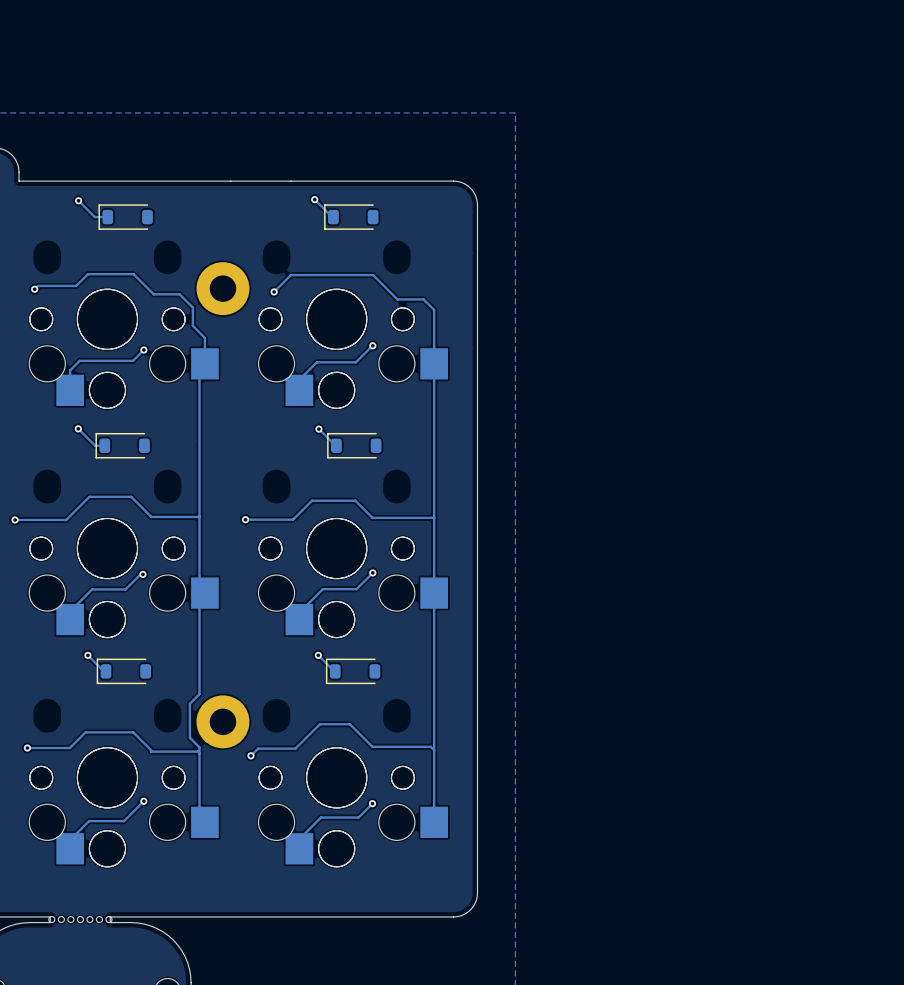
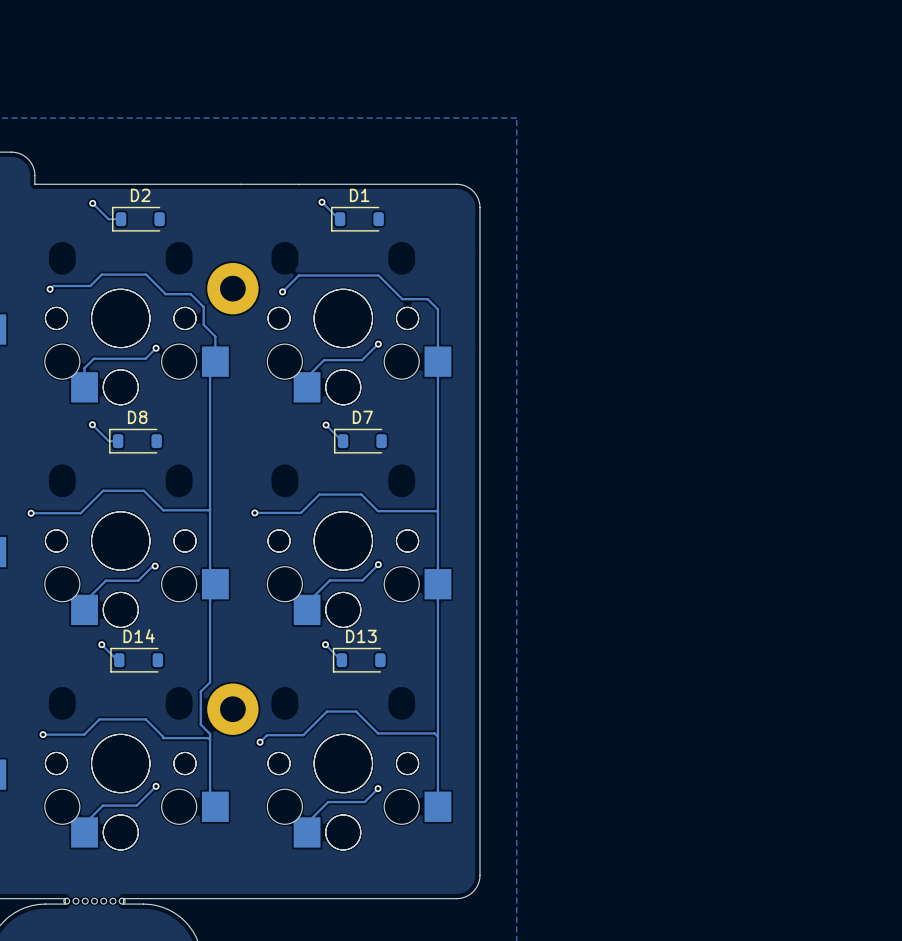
D2 name: none -> D2 (140, 195)
D1 name: none -> D1 (359, 195)
D8 name: none -> D8 (137, 417)
D7 name: none -> D7 (362, 417)
D14 name: none -> D14 (139, 636)
D13 name: none -> D13 (361, 636)

